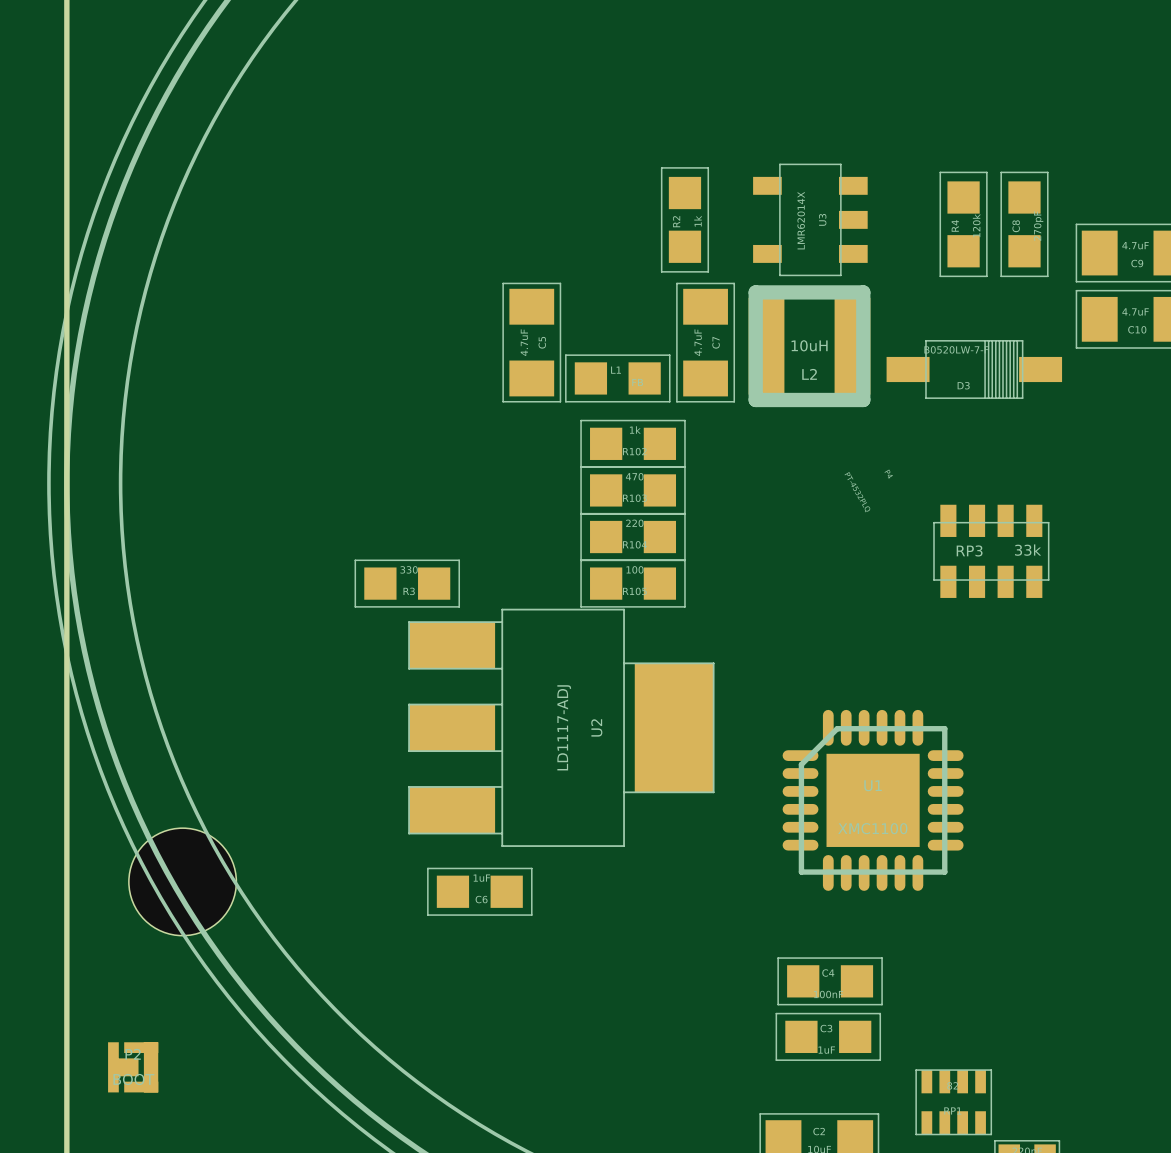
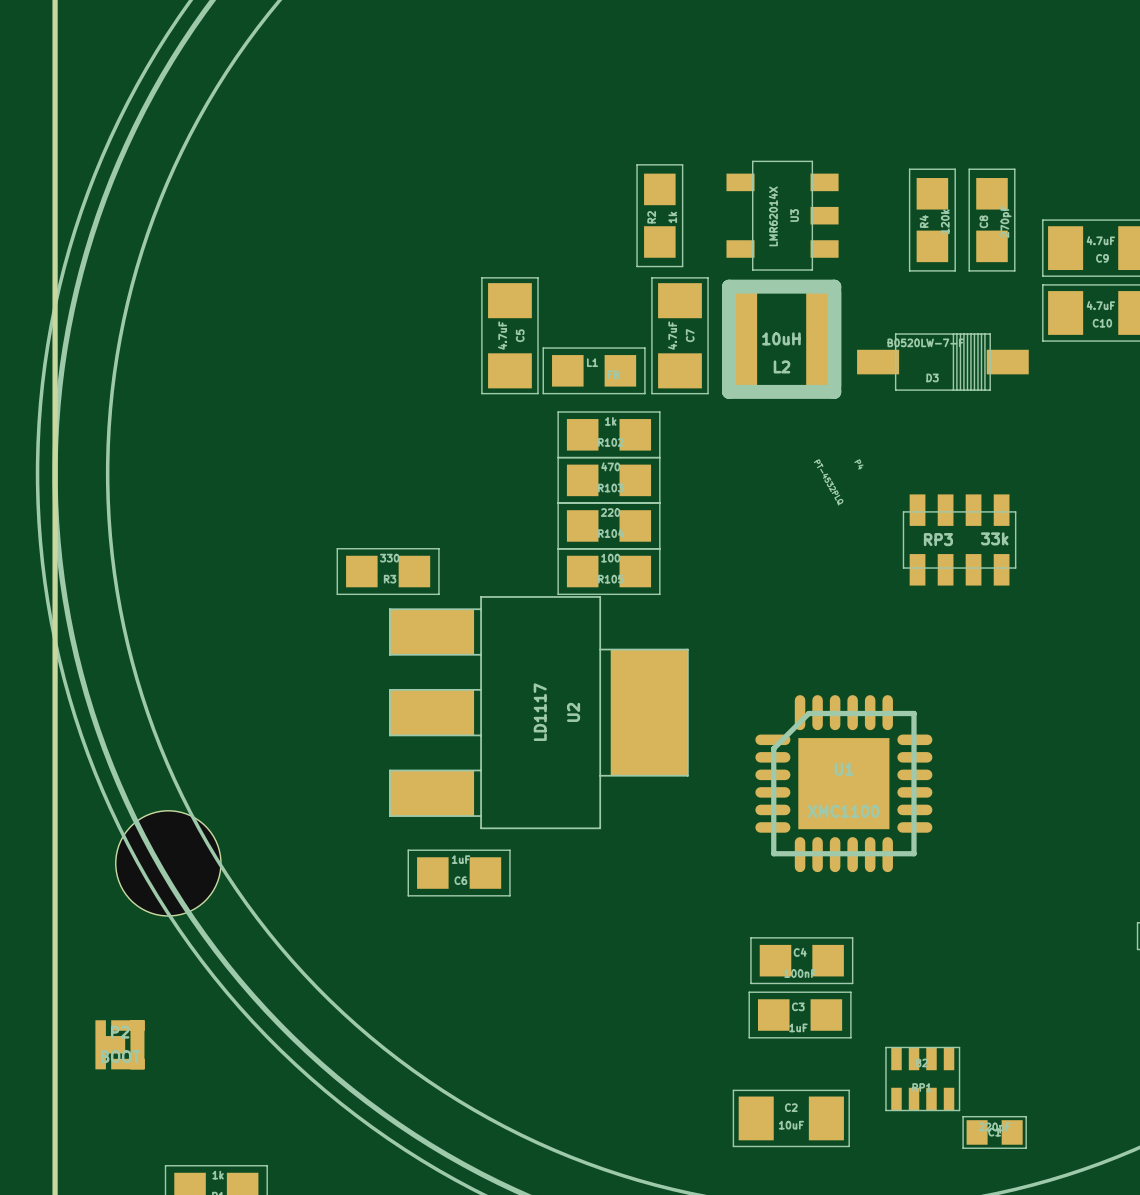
U2 value: LD1117-ADJ (564, 727) -> LD1117 (540, 712)

